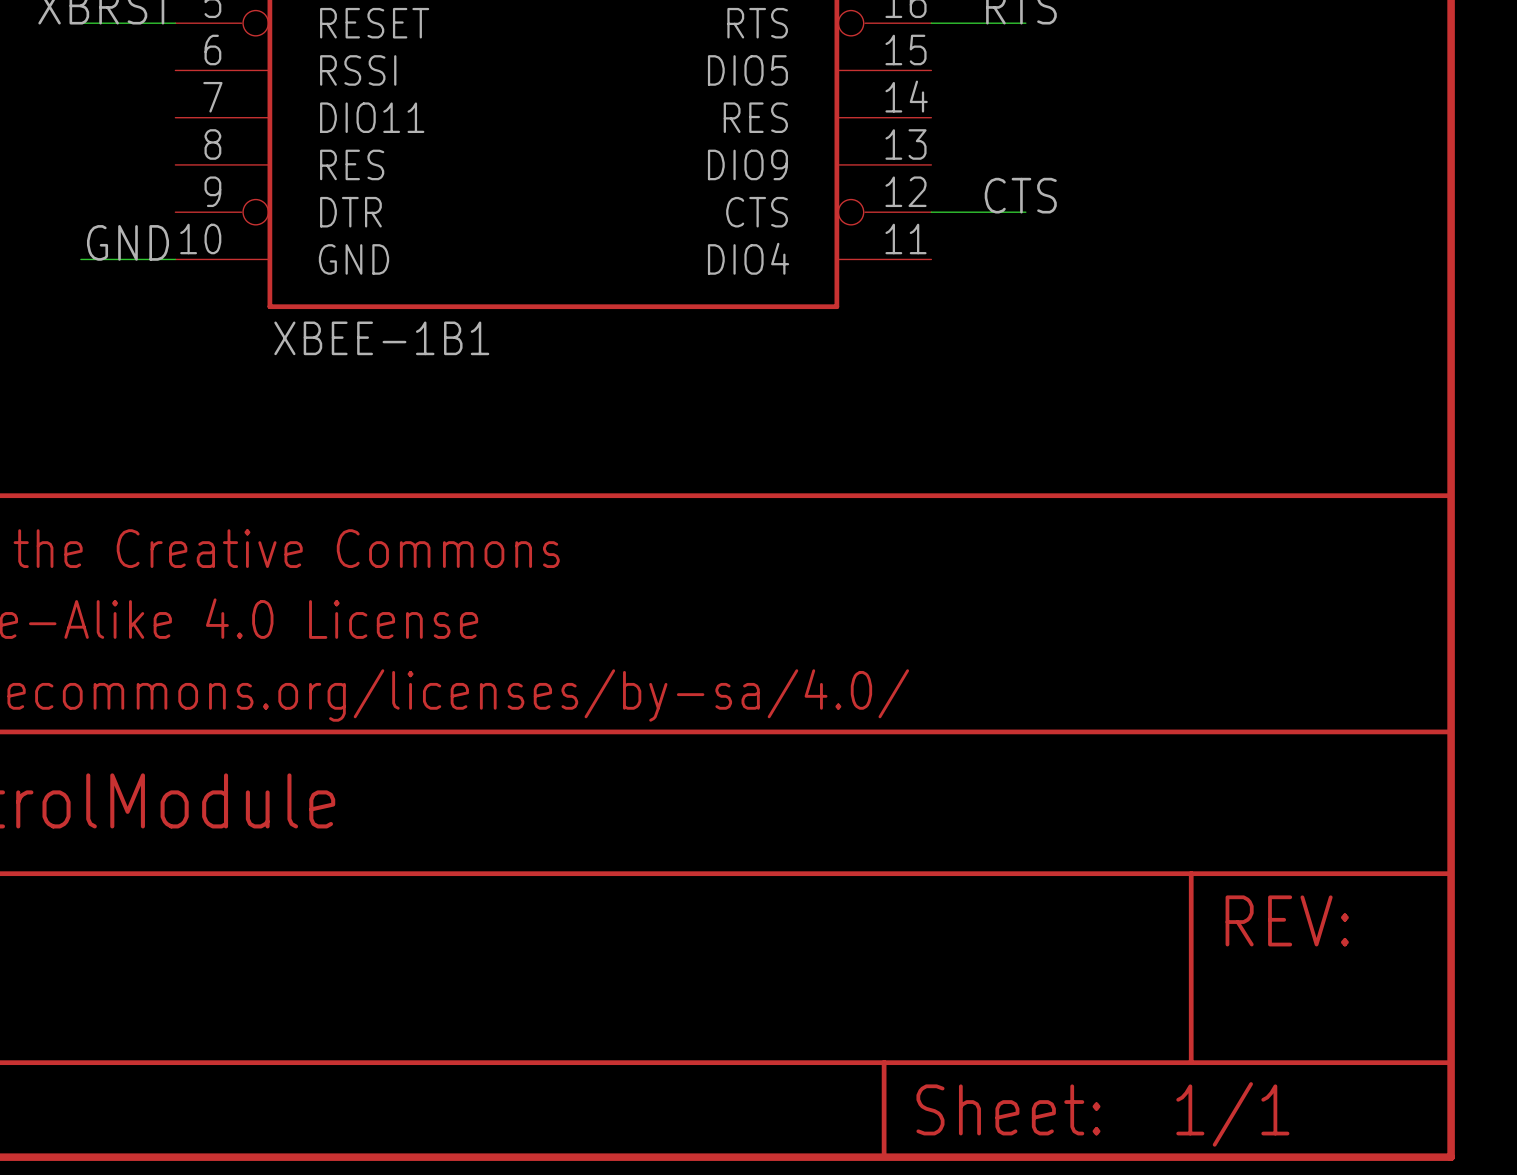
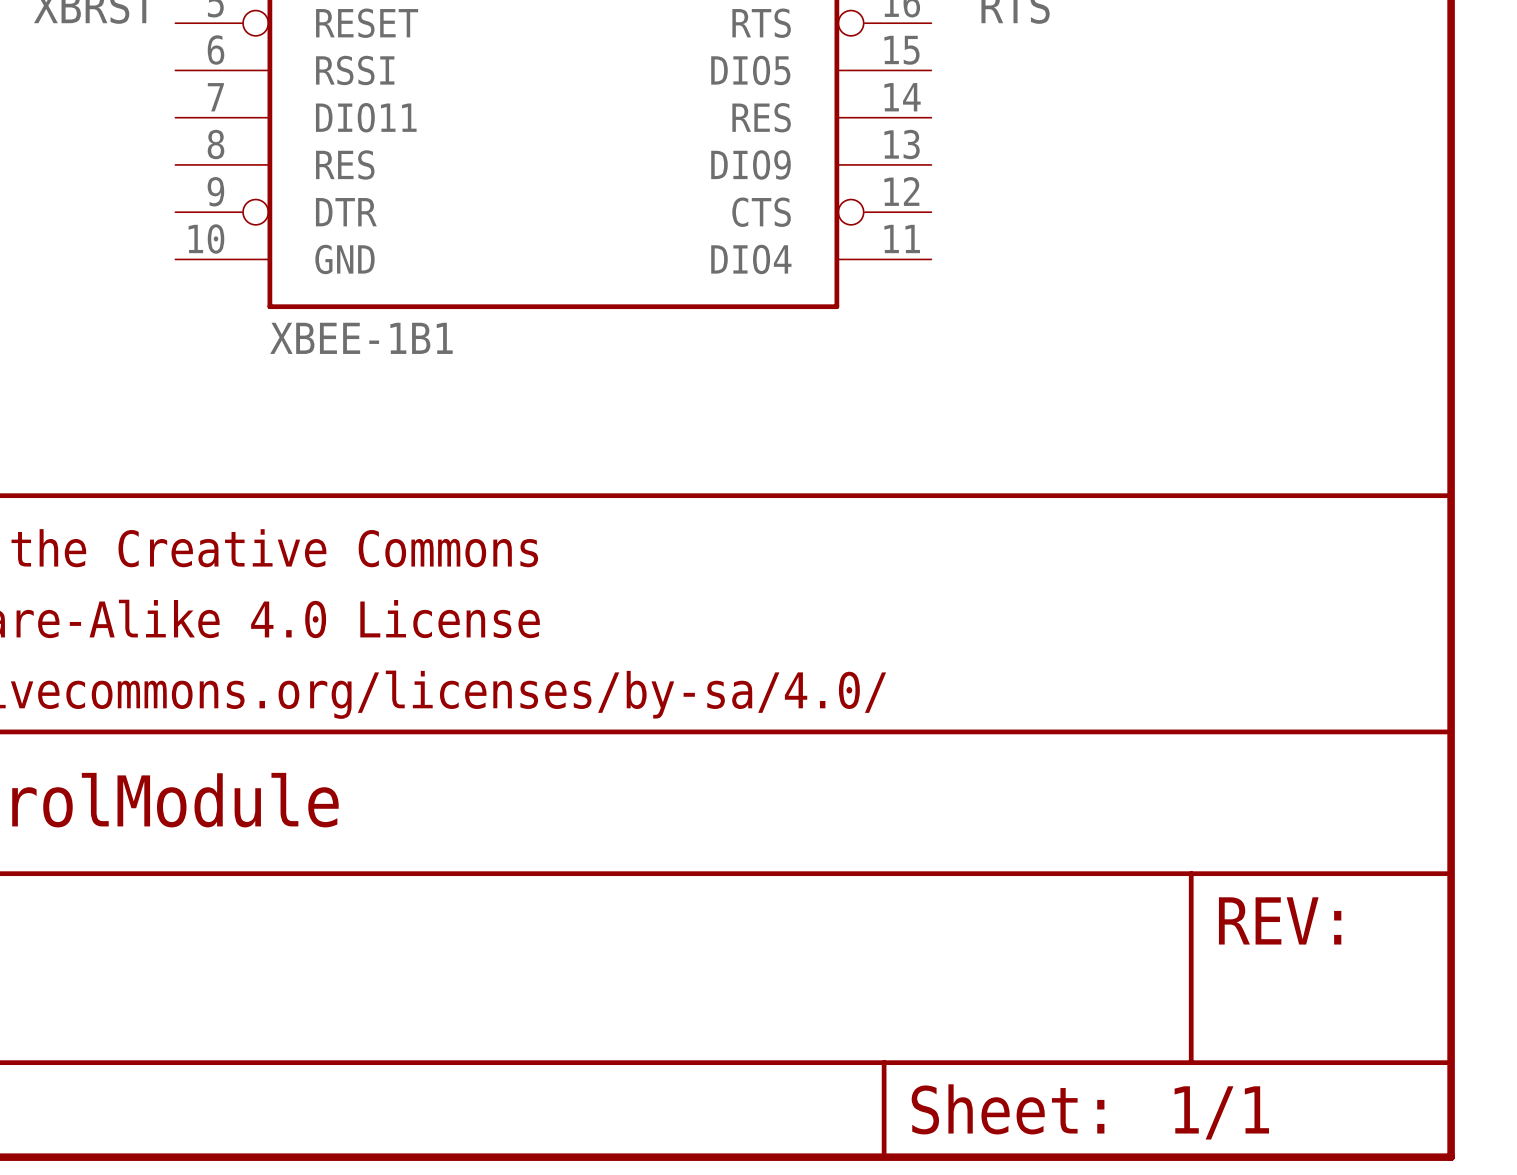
wire: (80, 23) (175, 23) -> none
wire: (931, 23) (1025, 23) -> none
label: CTS (1020, 195) -> none
wire: (931, 212) (1025, 212) -> none
label: GND (127, 242) -> none
wire: (80, 259) (175, 259) -> none

